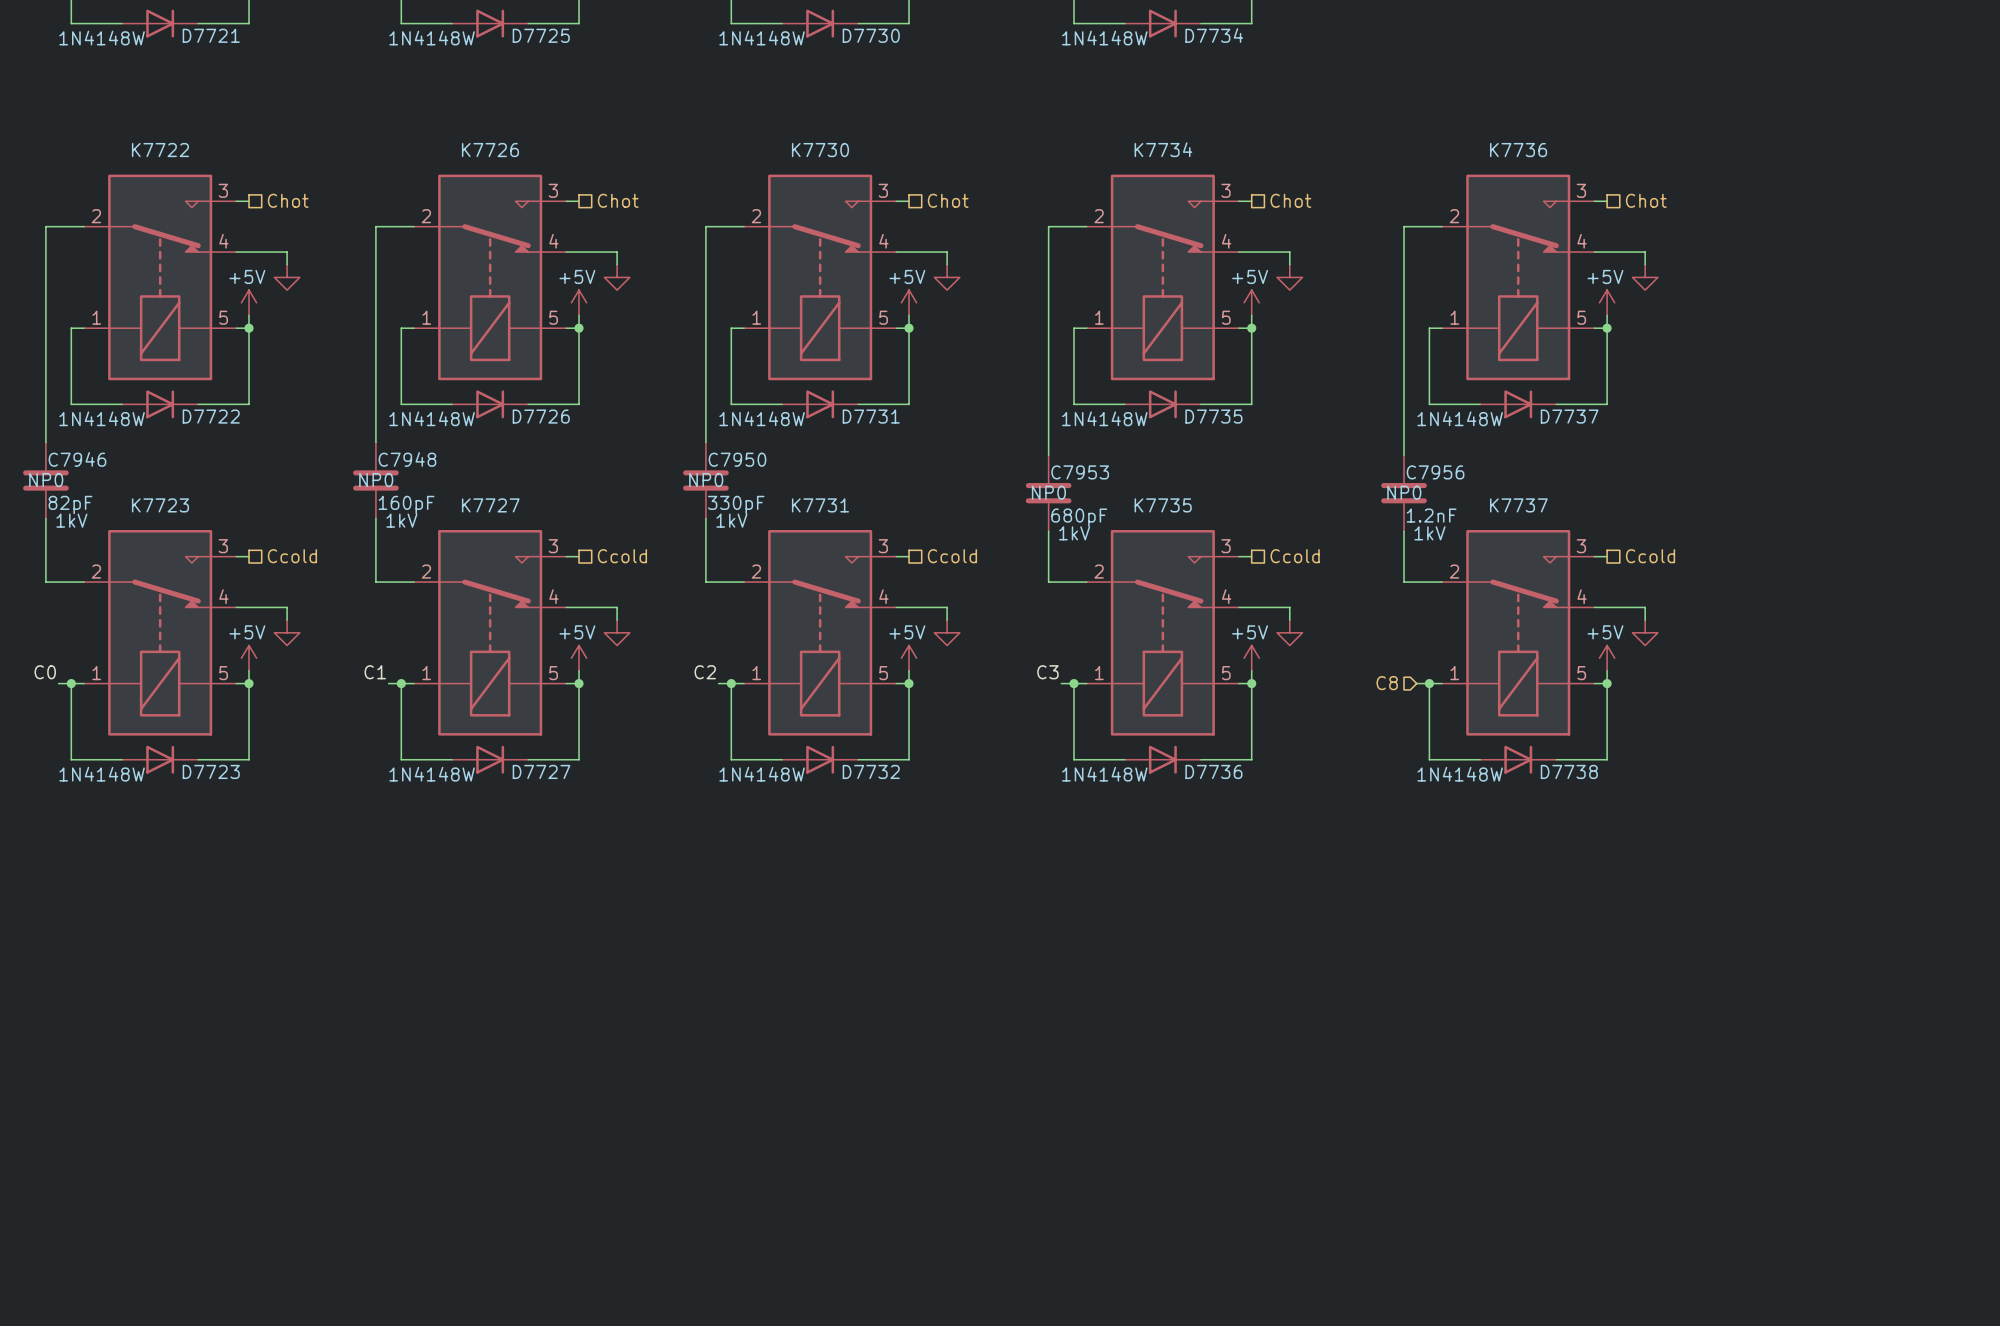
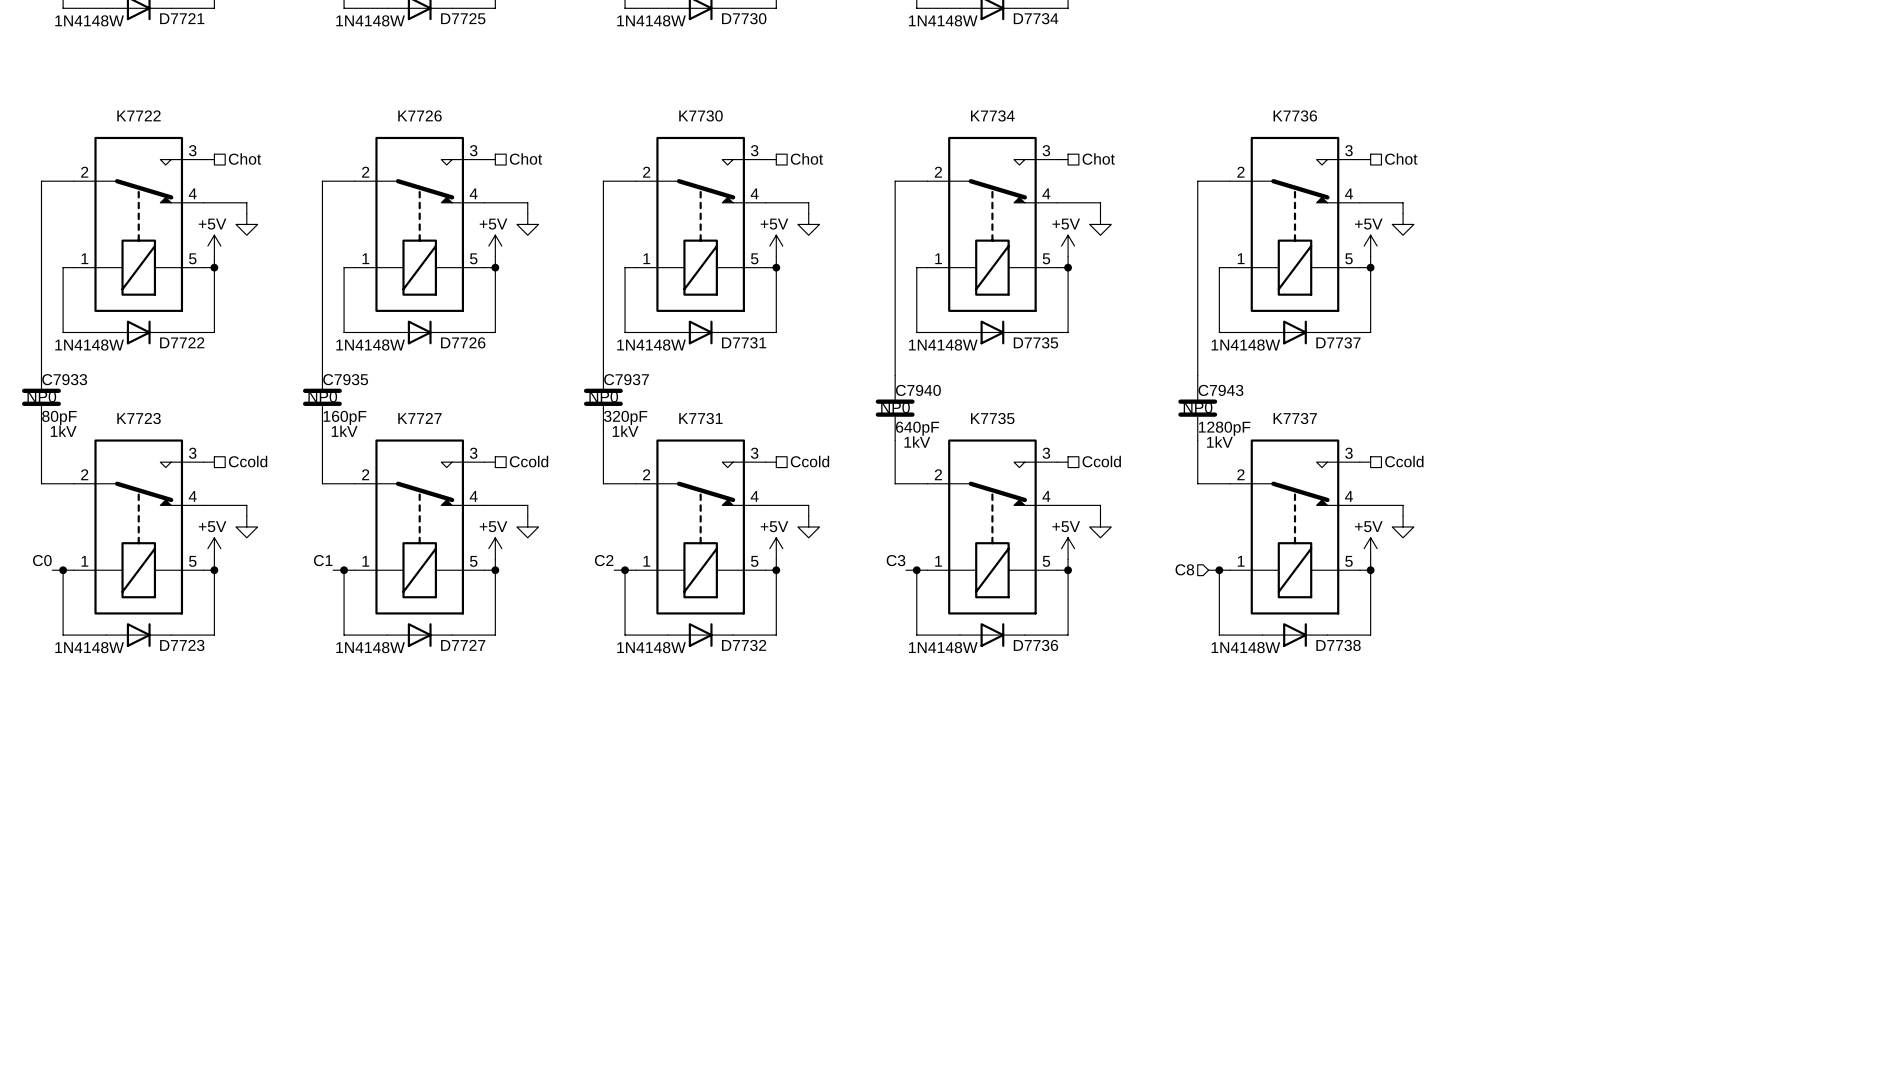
C7946 name: C7946 (77, 459) -> C7933 (64, 379)
C7948 name: C7948 (407, 459) -> C7935 (345, 379)
C7950 name: C7950 (737, 459) -> C7937 (626, 379)
C7953 name: C7953 (1080, 472) -> C7940 (918, 390)
C7956 name: C7956 (1435, 472) -> C7943 (1220, 390)
C7946 value: 82pF (70, 504) -> 80pF (59, 417)
C7950 value: 330pF (736, 504) -> 320pF (625, 417)
C7956 value: 1.2nF (1431, 515) -> 1280pF (1224, 428)
C7953 value: 680pF (1079, 517) -> 640pF (917, 428)

